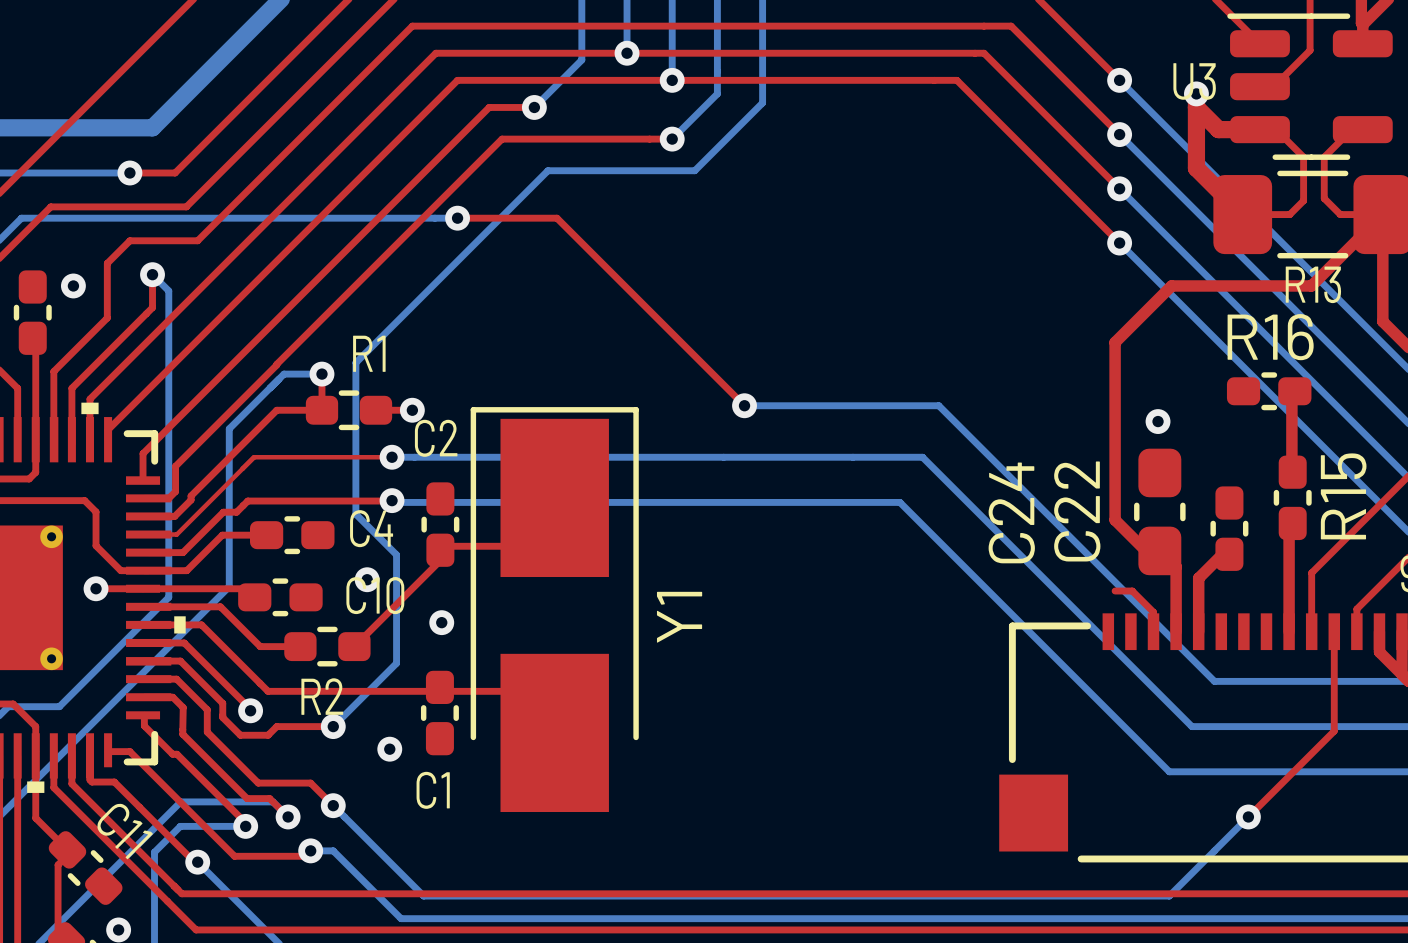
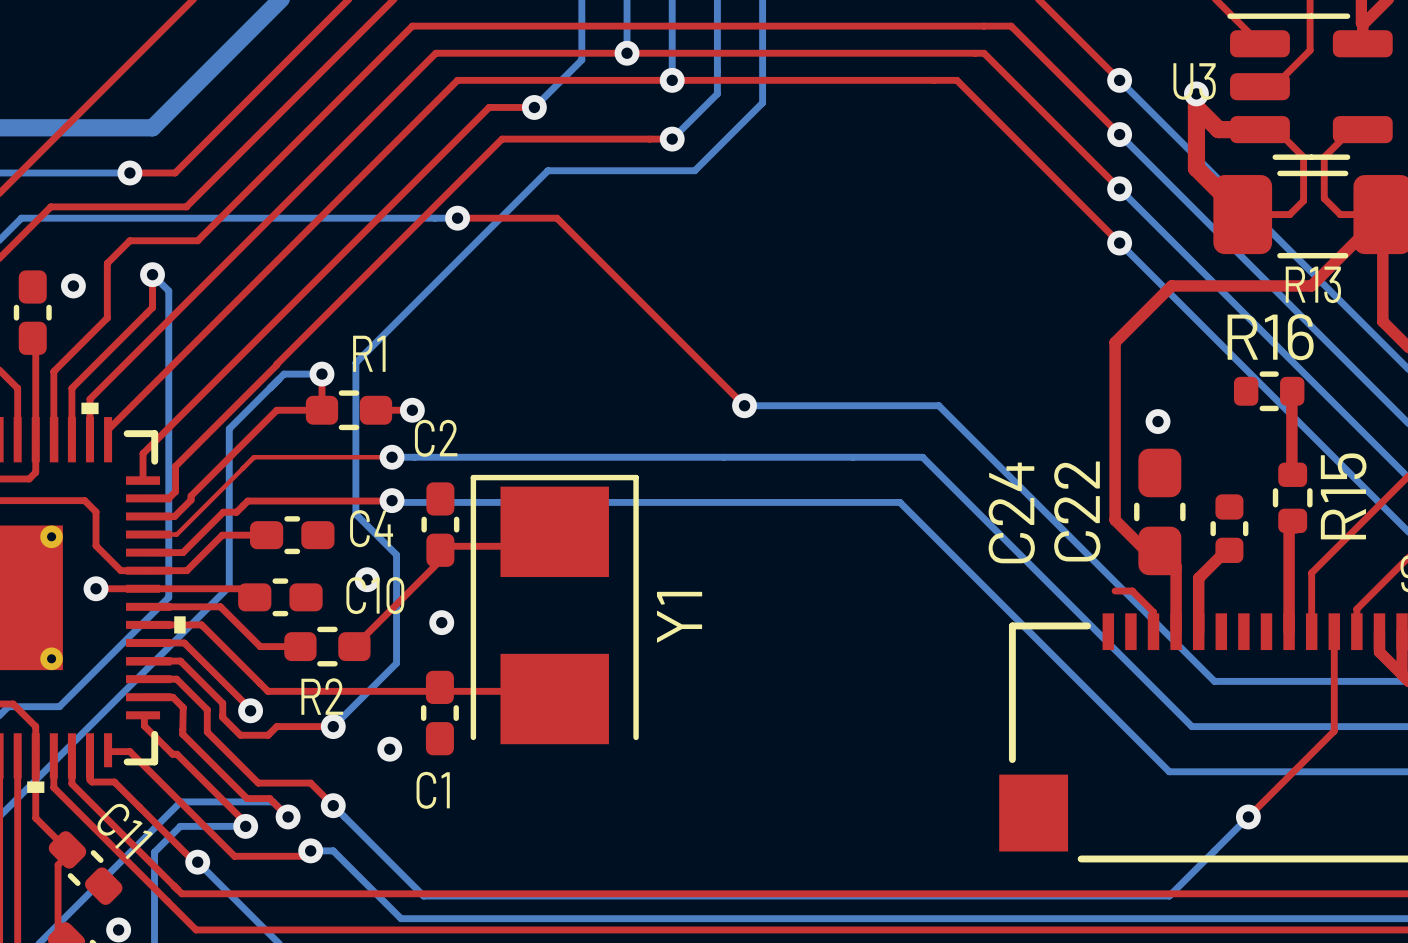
R16 footprint: [1226, 372, 1312, 411] -> [1233, 371, 1305, 412]
Y1 footprint: [470, 407, 639, 813] -> [470, 474, 639, 745]
R15 footprint: [1273, 455, 1312, 541] -> [1272, 462, 1313, 534]
C22 footprint: [1210, 486, 1249, 571] -> [1210, 494, 1249, 564]

